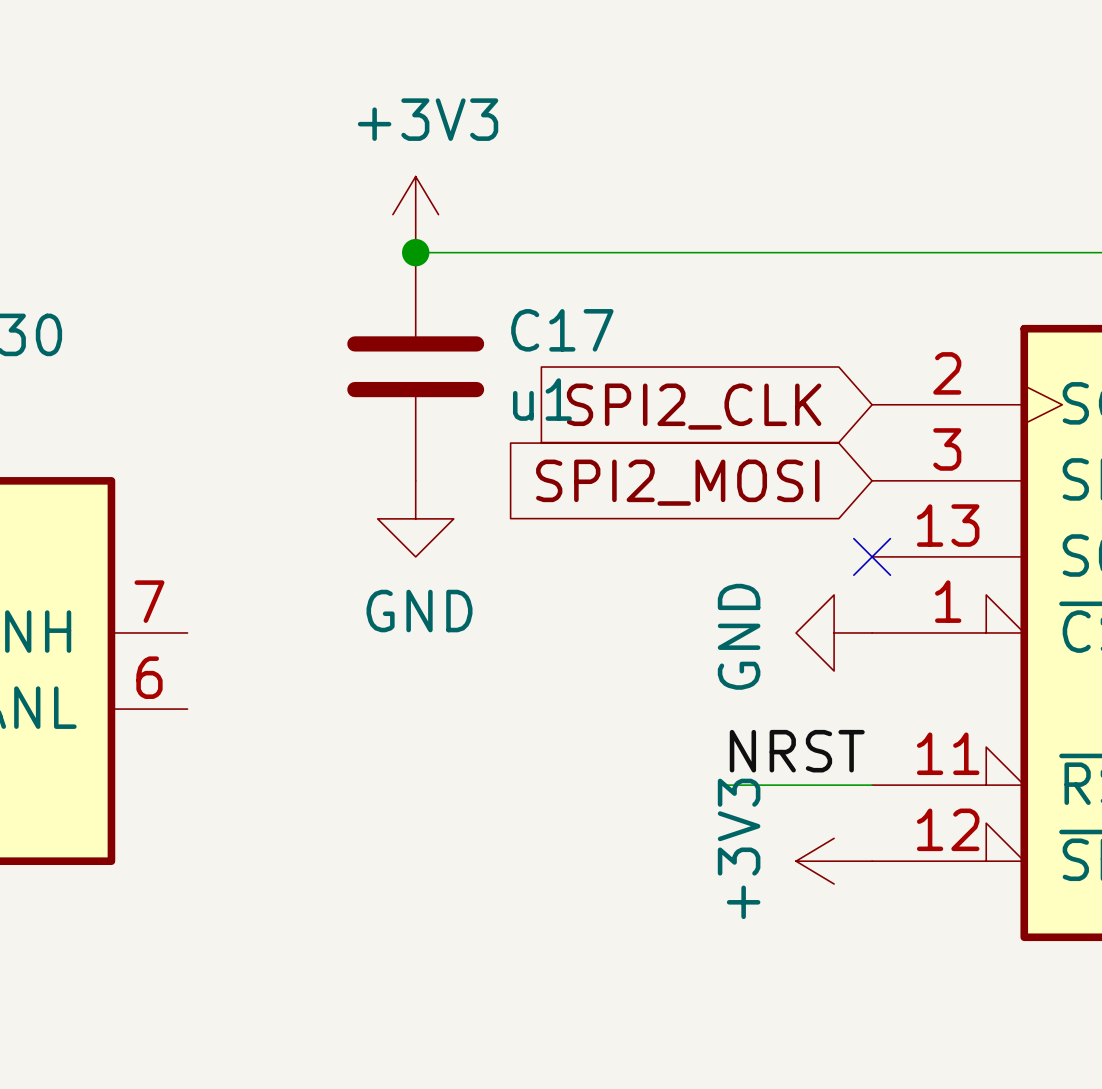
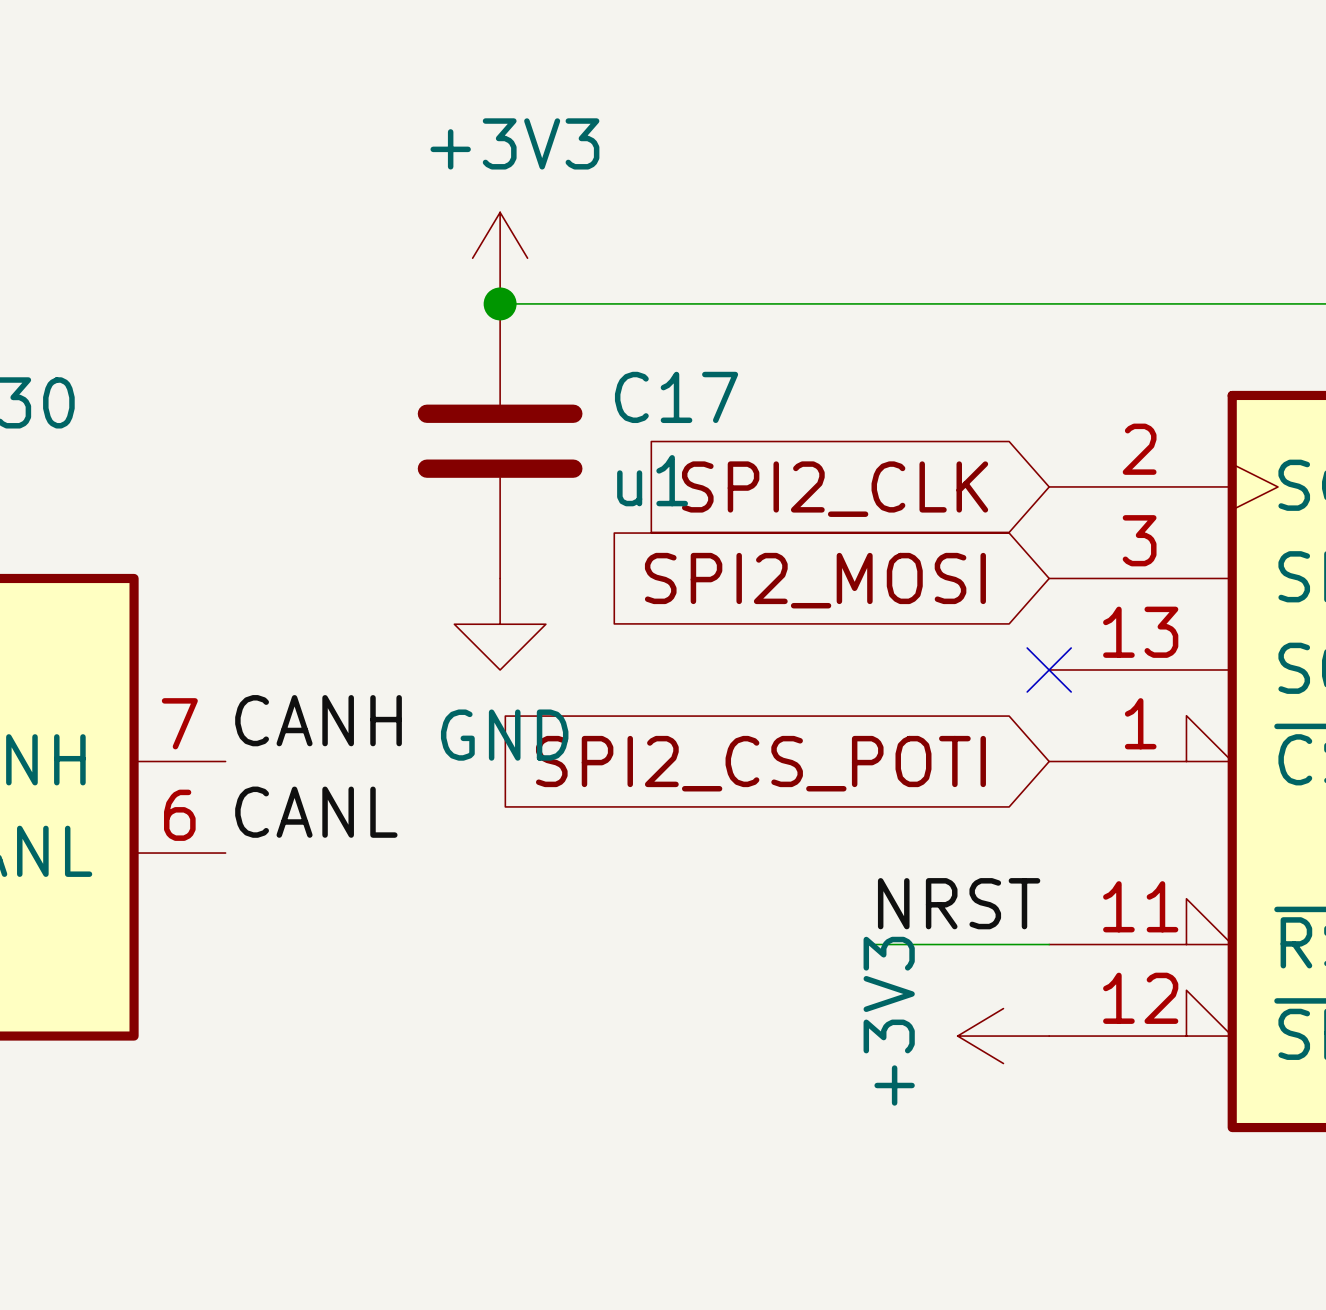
label: none -> CANH (318, 720)
power symbol: GND (834, 632) -> none
global label: none -> SPI2_CS_POTI (760, 763)
label: none -> CANL (316, 812)

